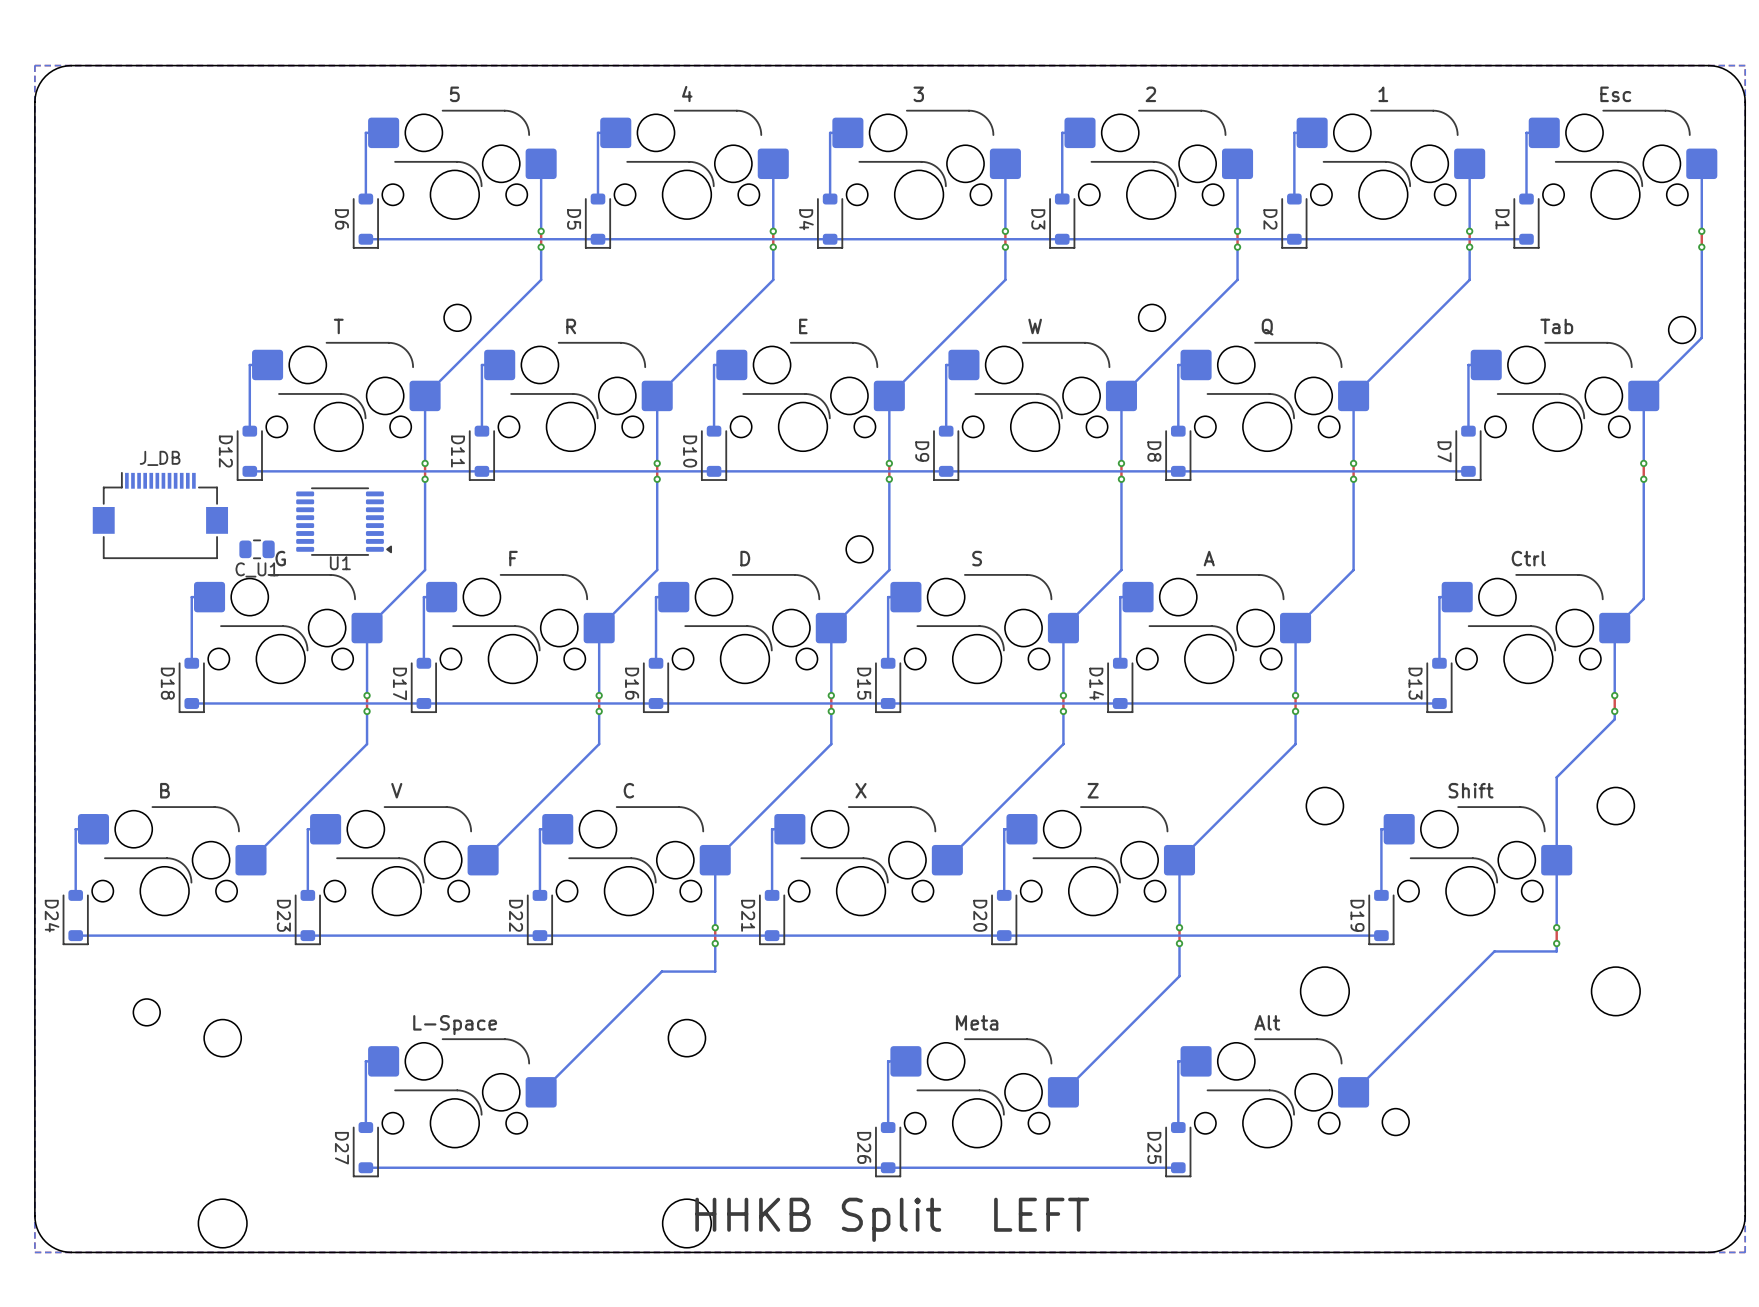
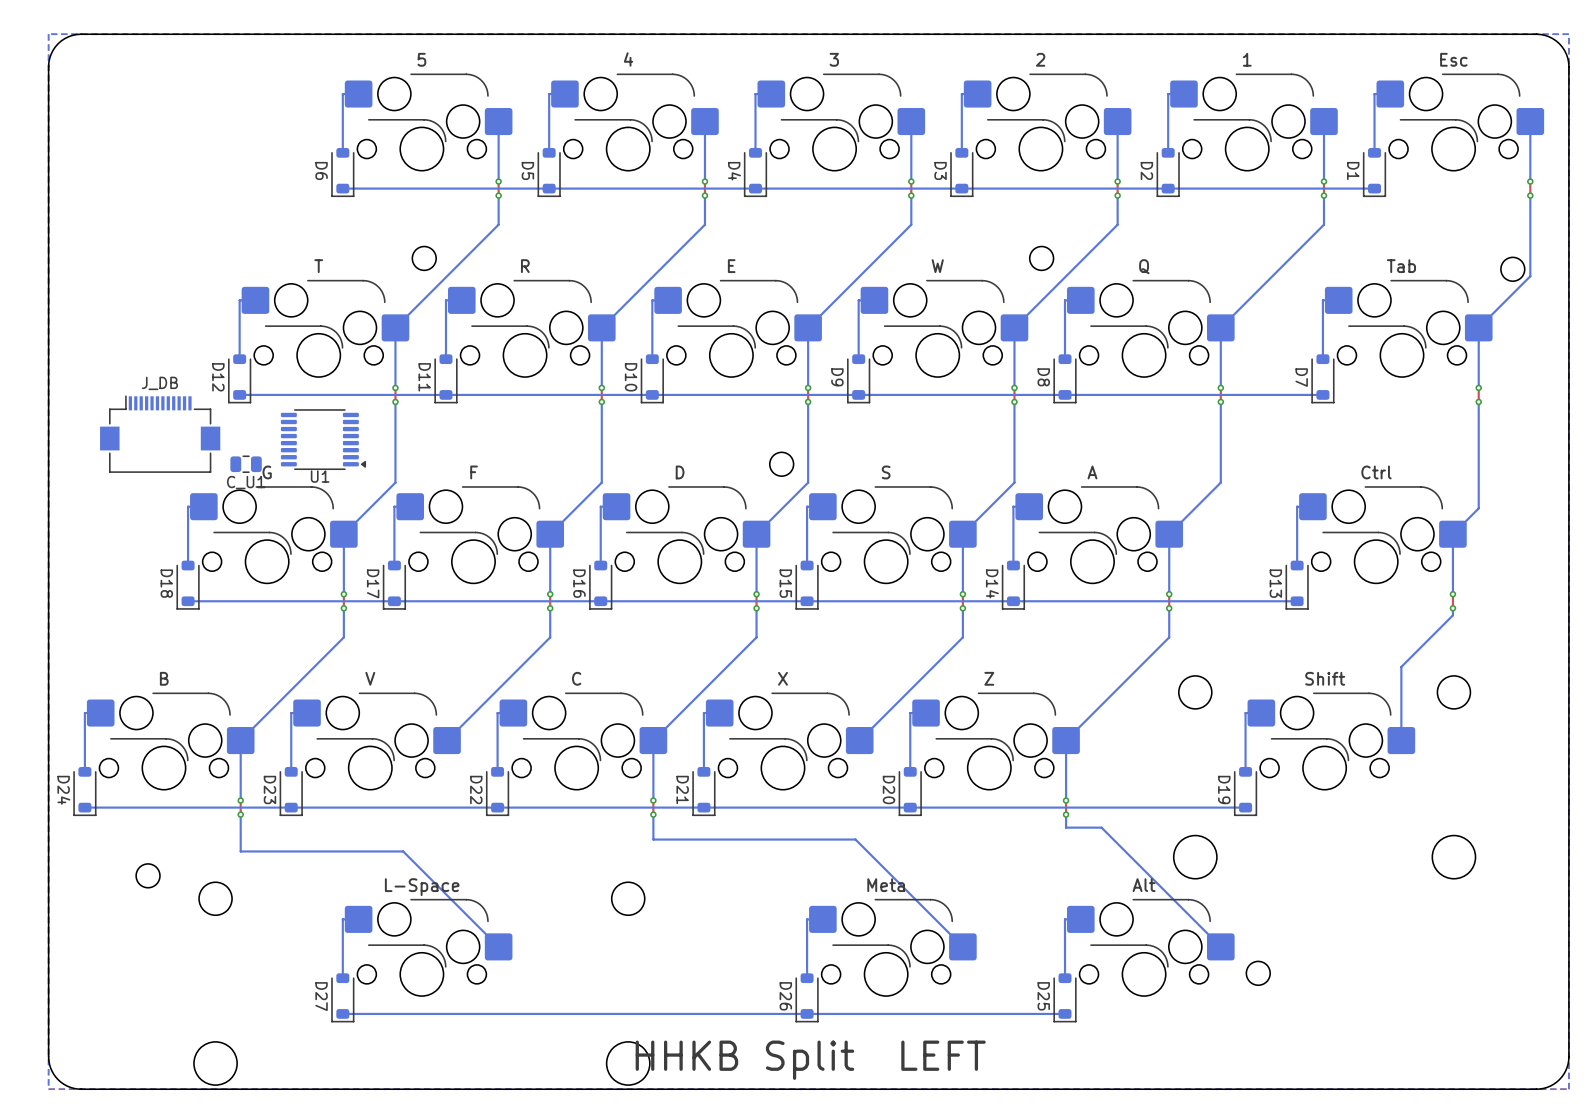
bottom track: none -> (240, 740) (240, 800)
bottom track: (1556, 860) (1556, 927) -> none
top track: none -> (240, 800) (240, 814)
via: none -> (240, 800)
top track: (1556, 927) (1556, 943) -> none
via: (1556, 927) -> none
via: none -> (240, 814)
bottom track: (1556, 943) (1556, 951) (1494, 951) (1353, 1092) -> none
via: (1556, 943) -> none
bottom track: (1179, 958) (1179, 976) (1063, 1092) -> (1066, 827) (1101, 827) (1220, 946)
bottom track: (715, 971) (661, 971) (541, 1092) -> (240, 814) (240, 851) (403, 851) (498, 946)
bottom track: none -> (653, 839) (855, 839) (962, 946)

